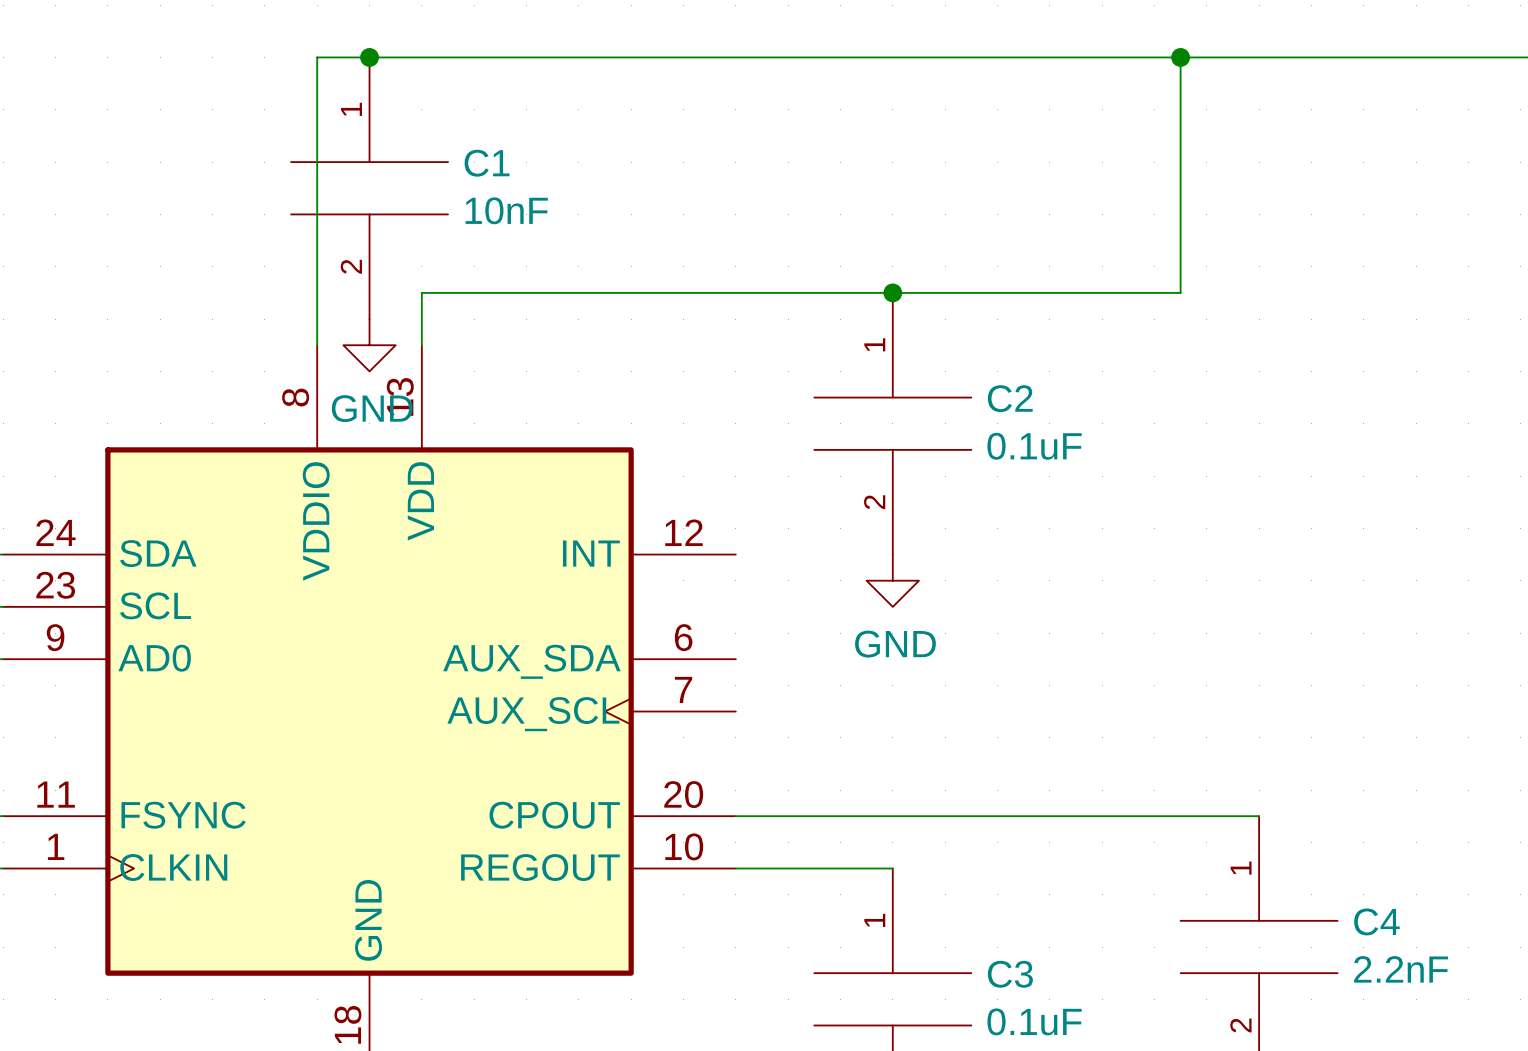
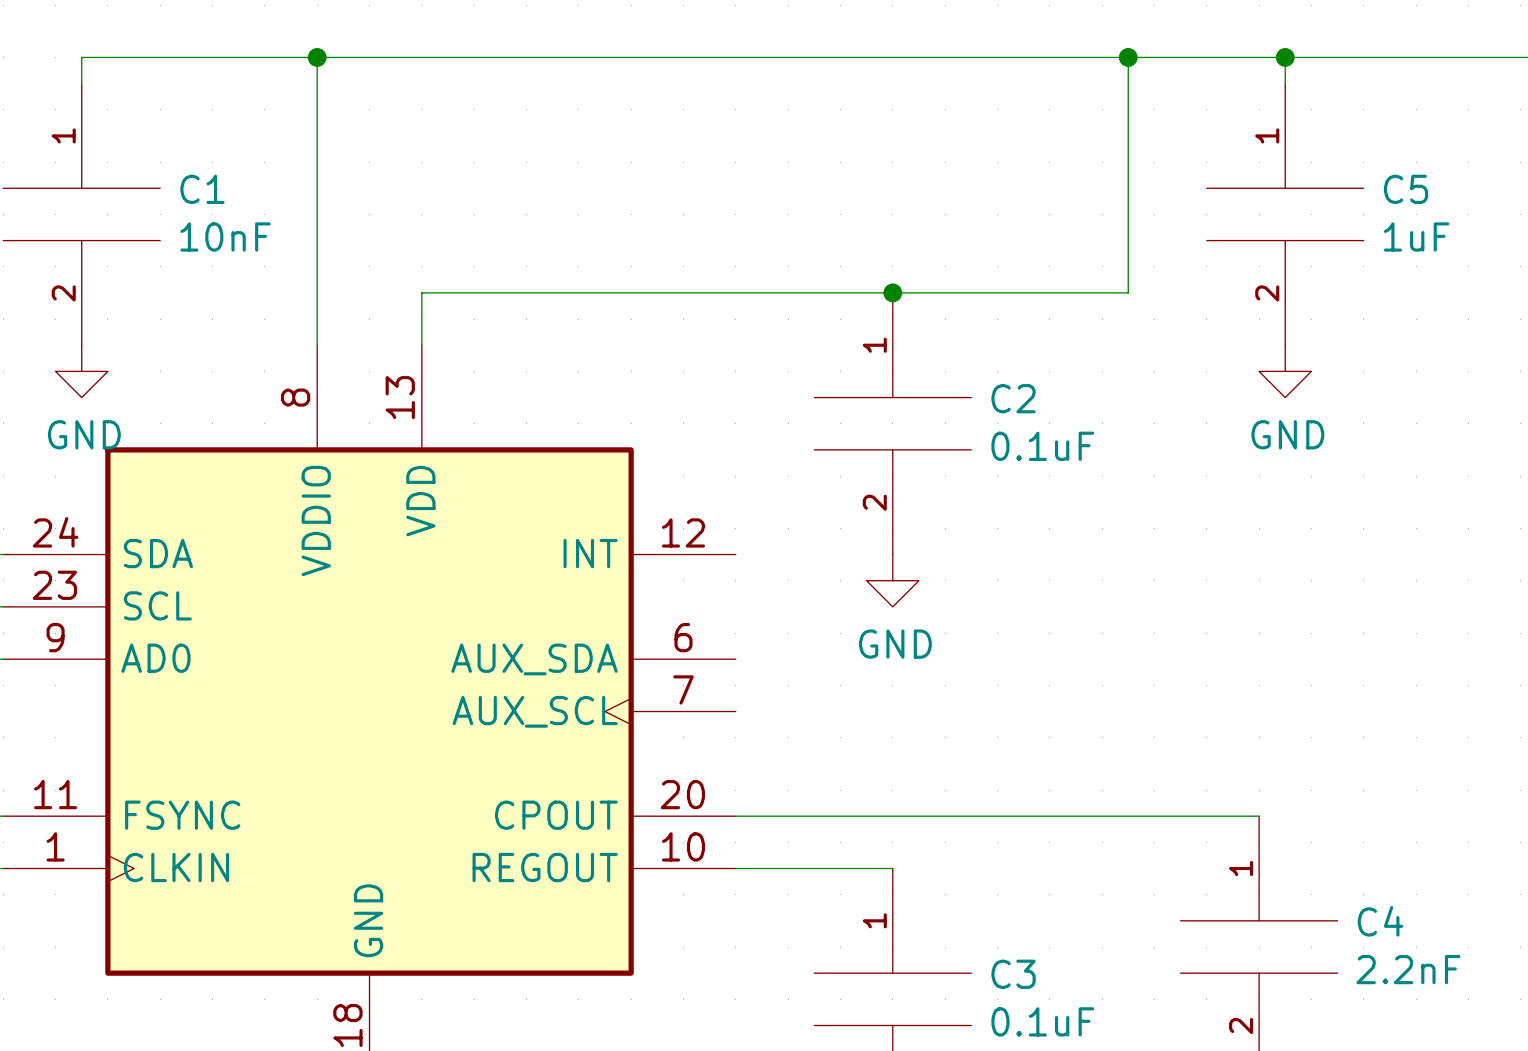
wire: none -> (317, 57) (81, 57) (81, 83)
junction position: (369, 57) -> (317, 57)
junction: none -> (1128, 57)
wire: (1180, 57) (1180, 292) (1128, 292) -> (1128, 57) (1128, 292)
junction: (1180, 57) -> none
wire: none -> (1285, 57) (1285, 83)
junction: none -> (1285, 57)
C1 position: (369, 188) -> (81, 214)
C5: none -> 1uF (1285, 214)
power symbol position: GND (369, 345) -> GND (81, 371)
power symbol: none -> GND (1285, 371)

